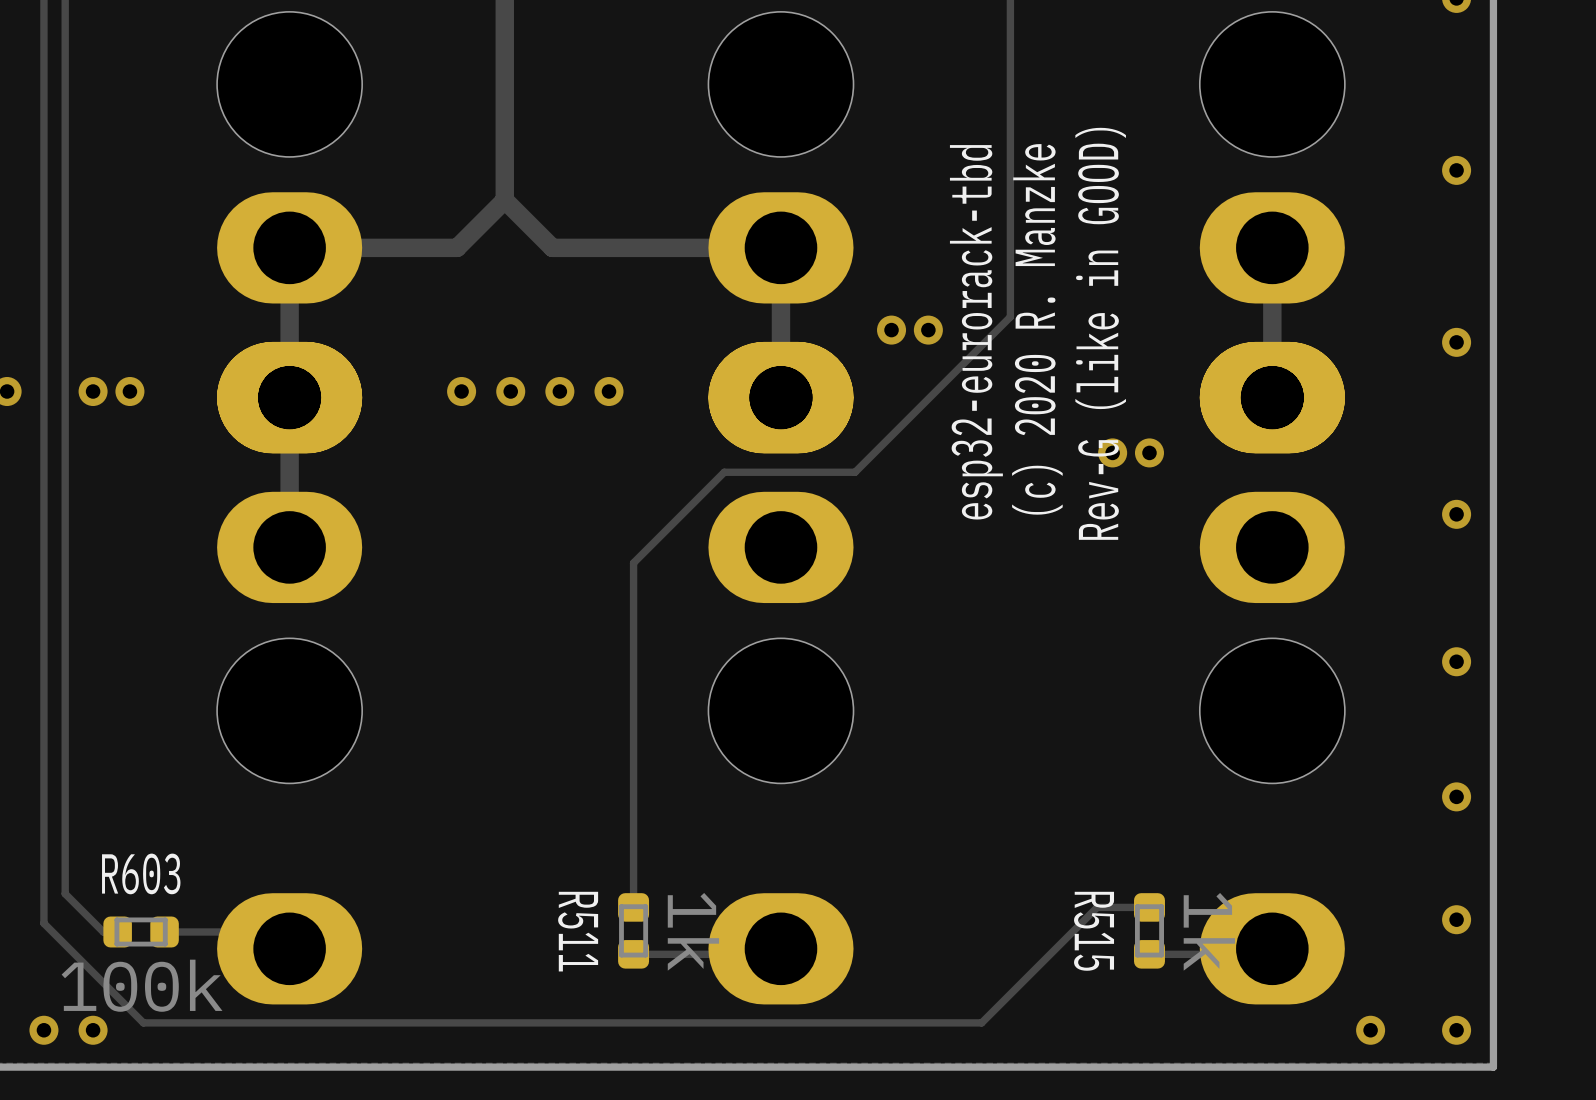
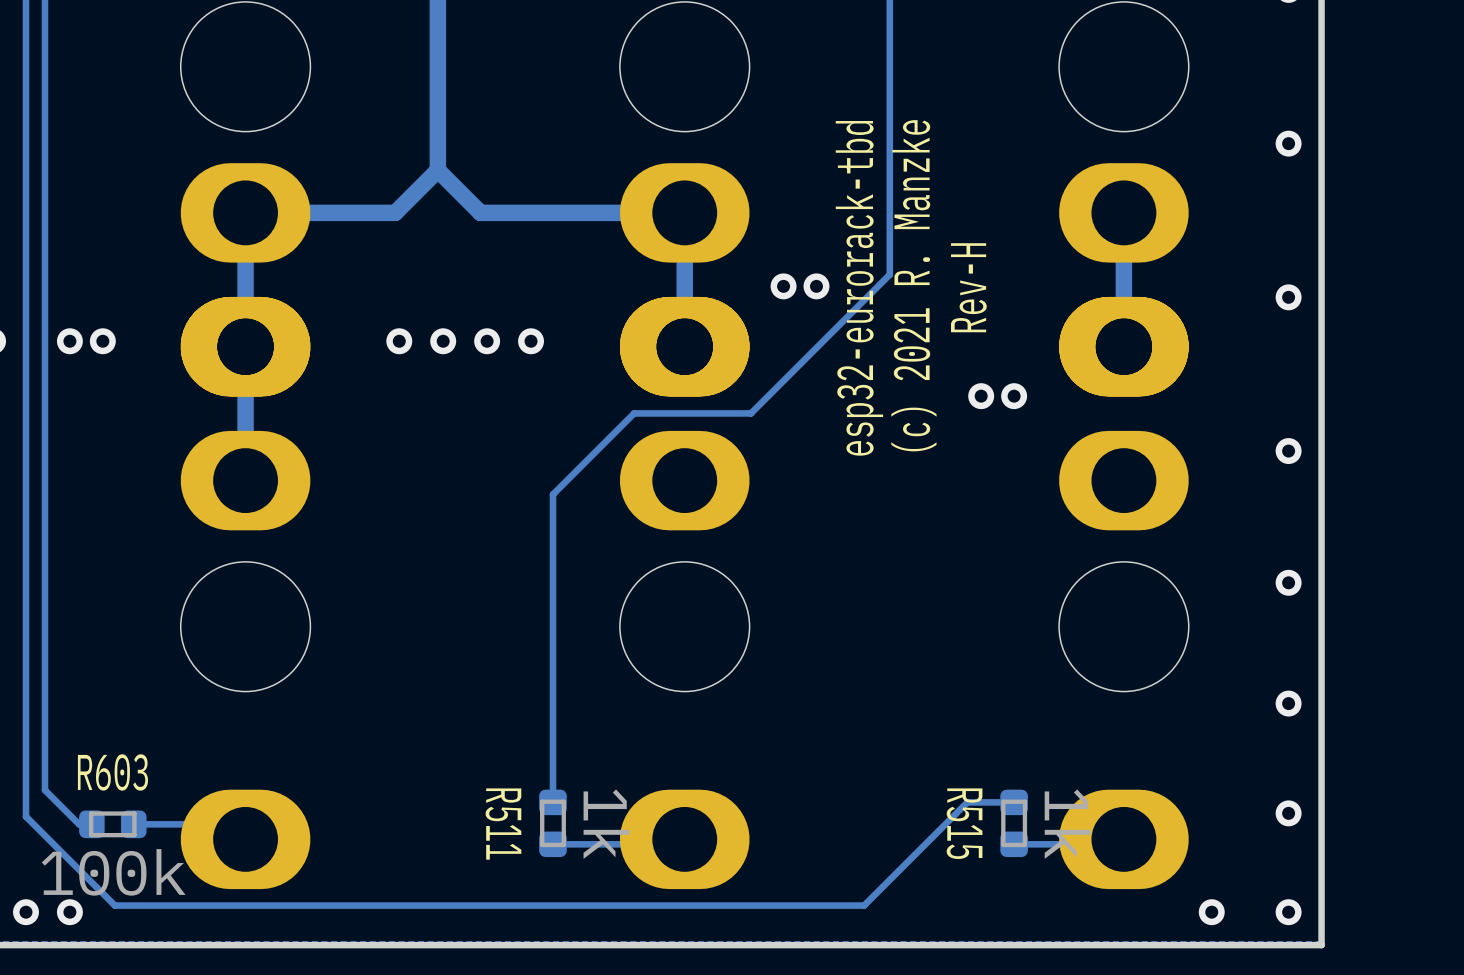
text: (c) 2020 R. Manzke (1037, 329) -> (c) 2021 R. Manzke (913, 285)
text: Rev-G (like in GOOD) (1100, 333) -> Rev-H (968, 287)

